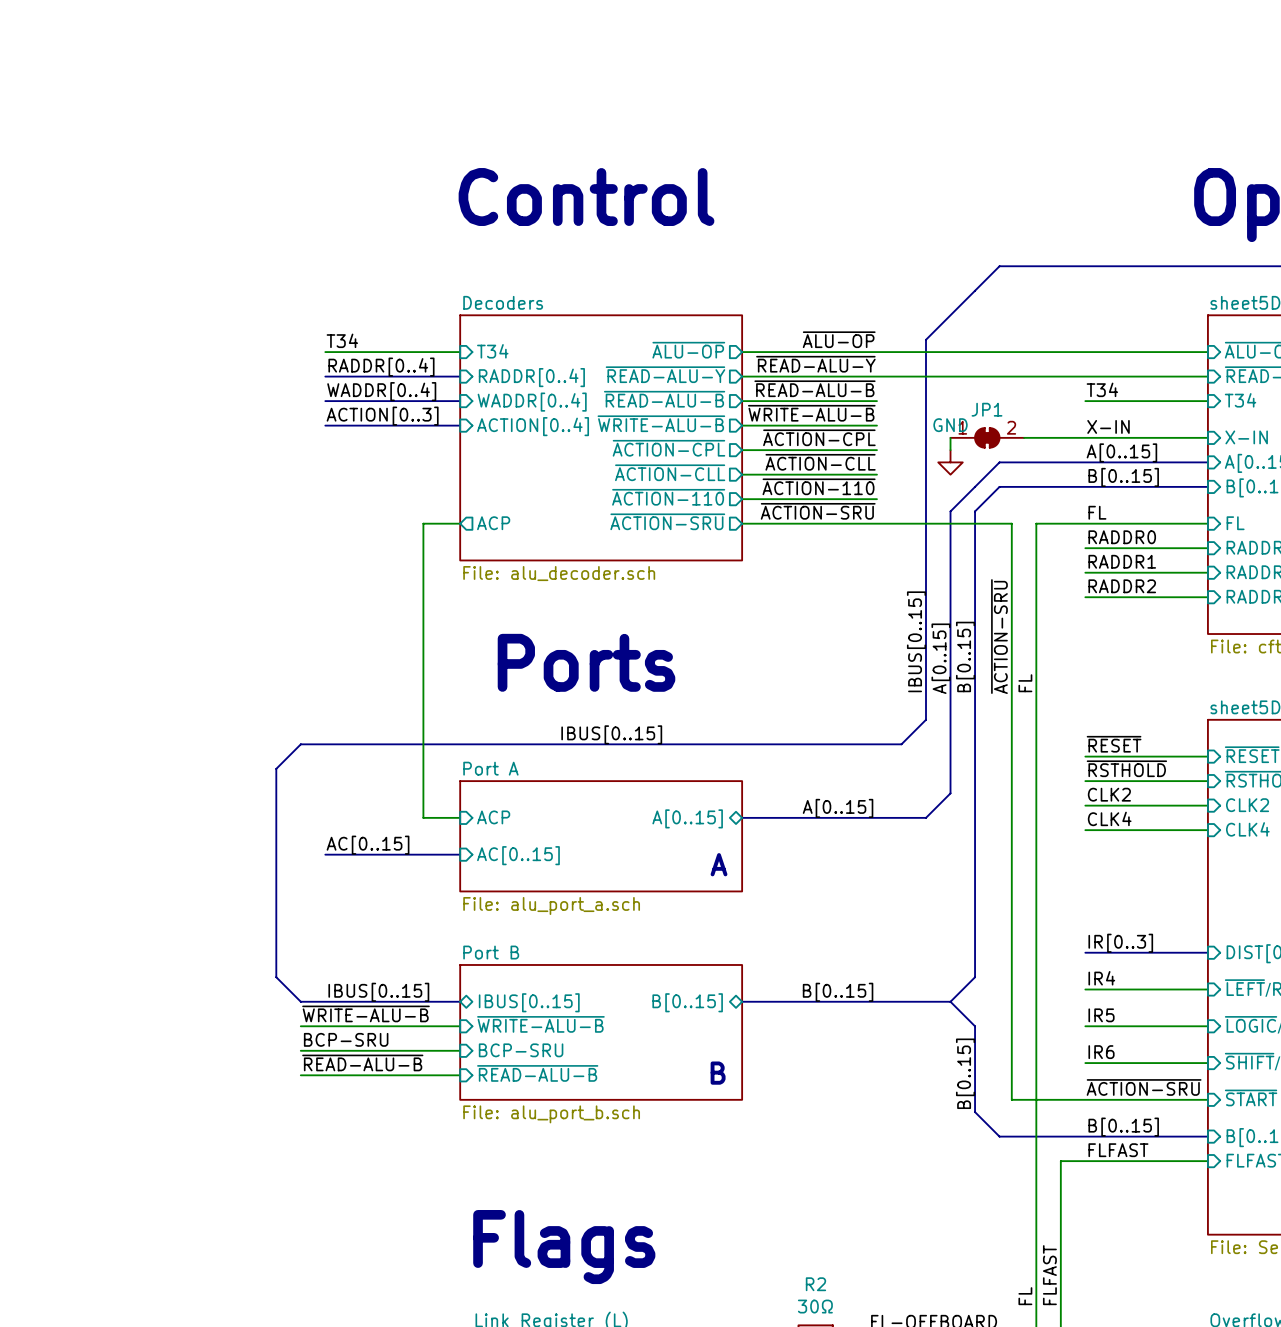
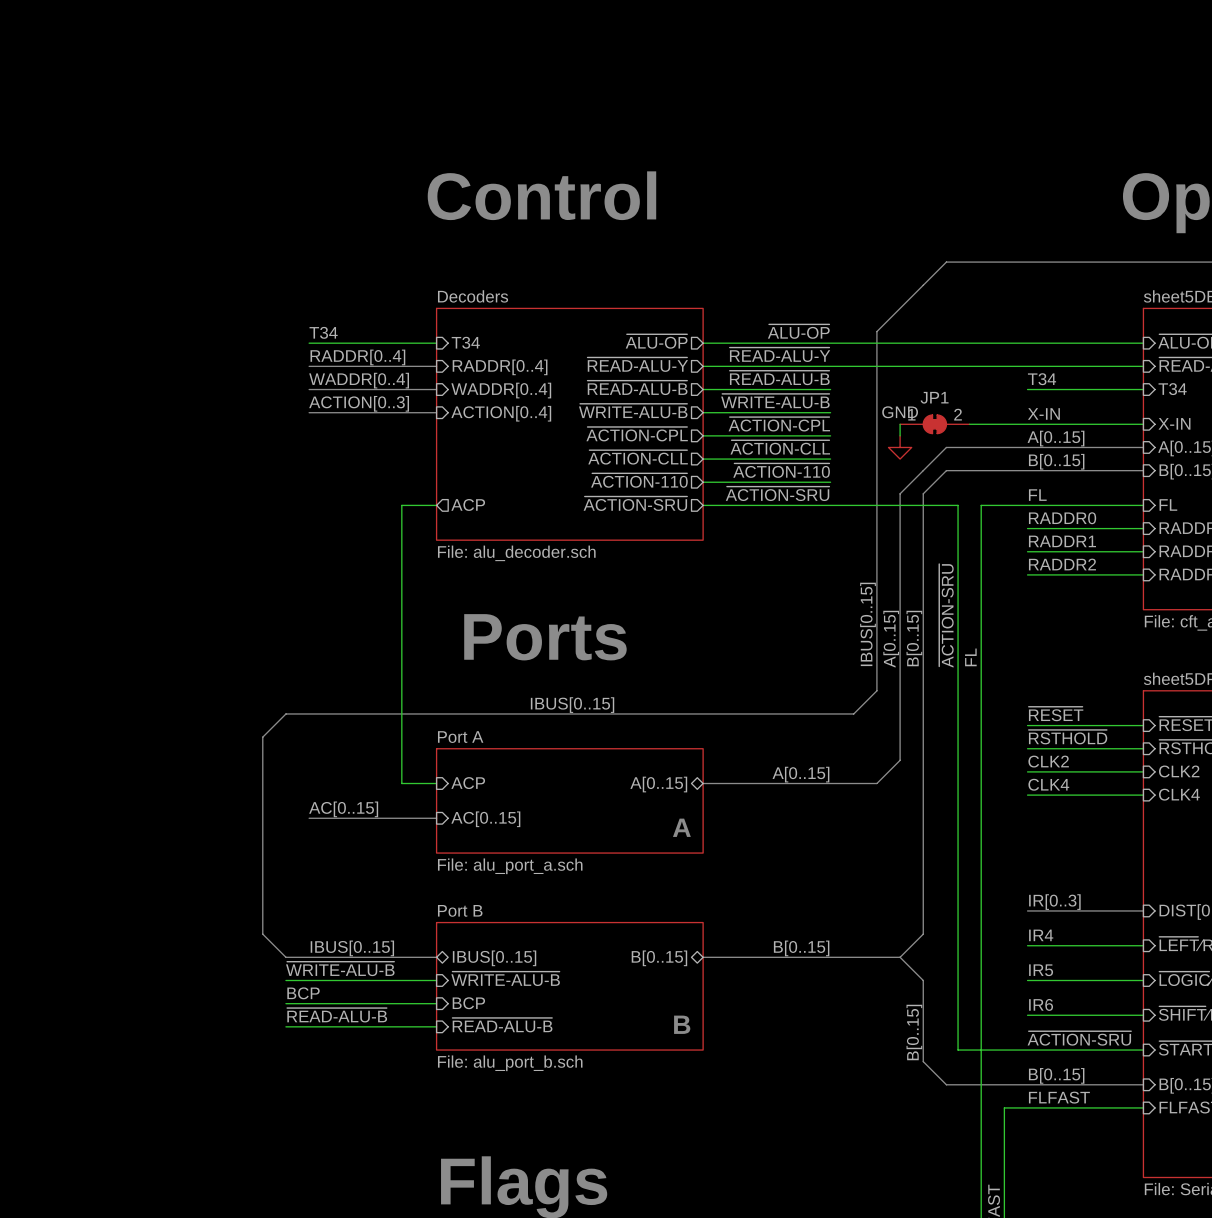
label: BCP-SRU (346, 1039) -> BCP (303, 993)
sheet pin: BCP-SRU (521, 1050) -> BCP (468, 1003)

